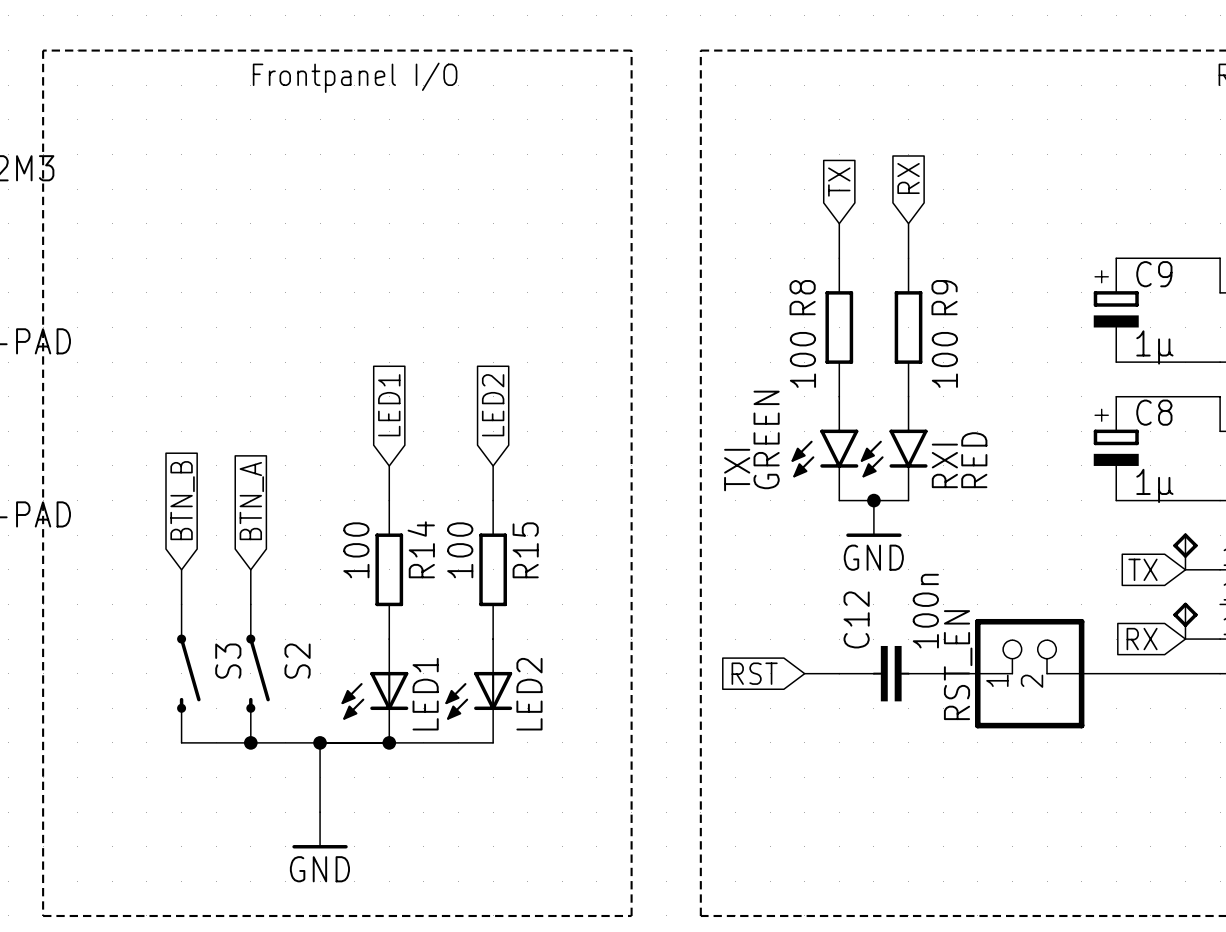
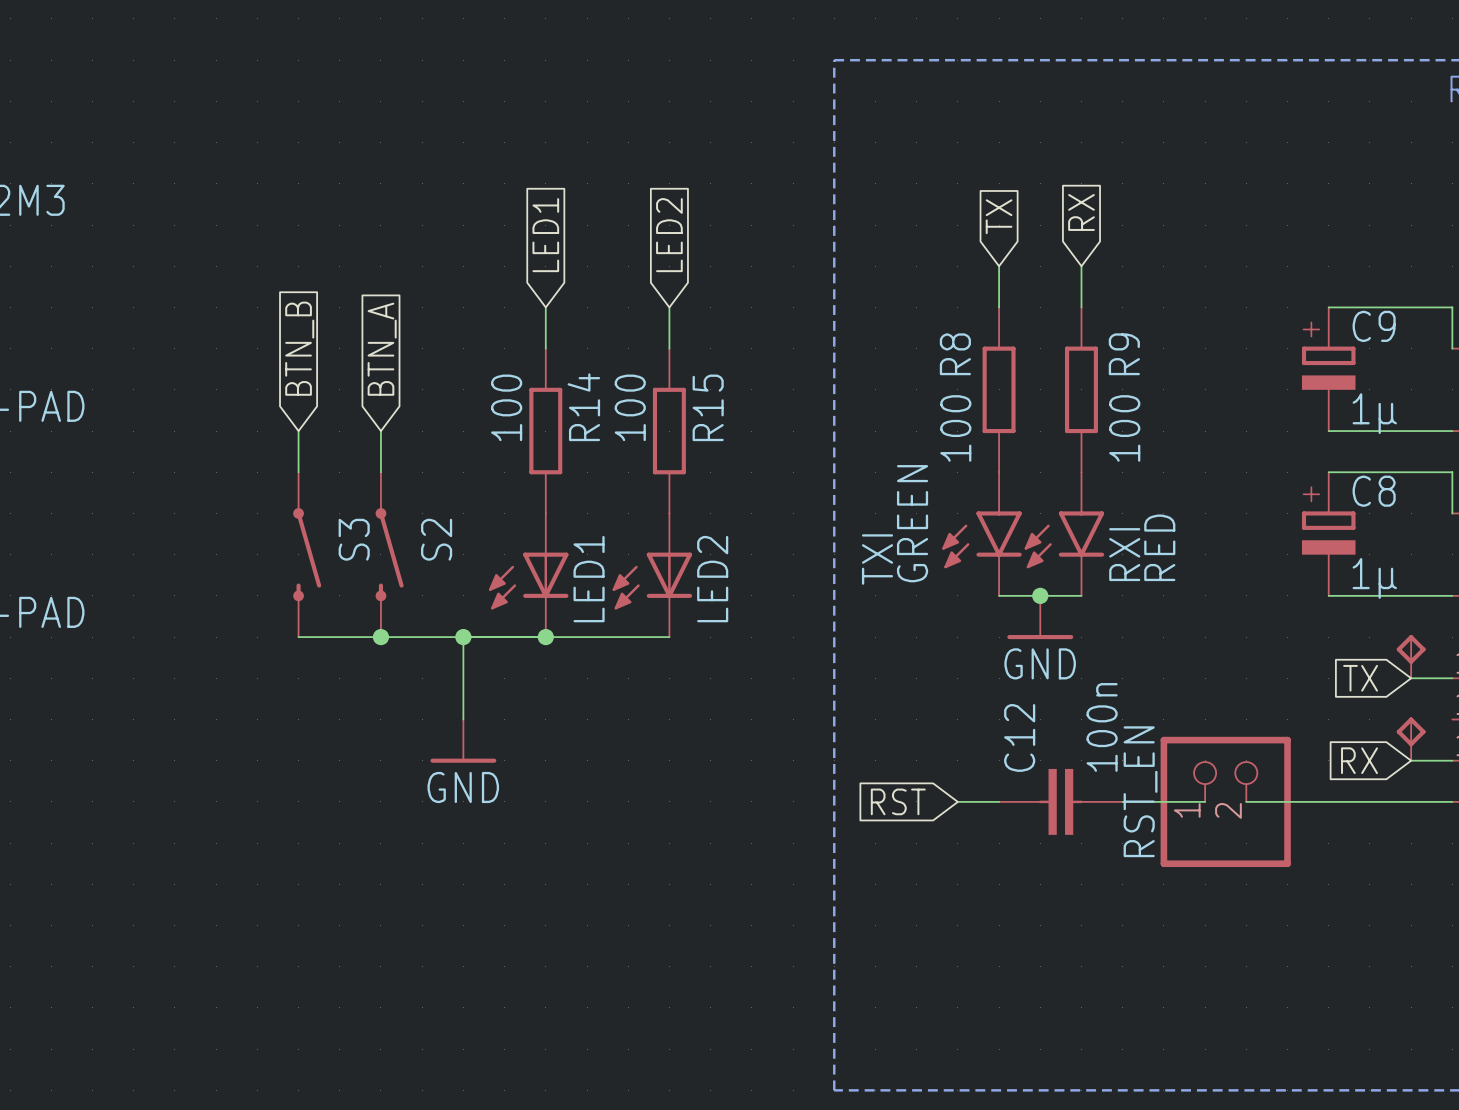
line: (43, 50) (631, 50) (631, 915) (43, 915) (43, 50) -> none
text: Frontpanel I/O (355, 77) -> none
global label position: LED1 (389, 405) -> LED1 (545, 235)
global label position: LED2 (493, 405) -> LED2 (669, 235)
wire: (389, 465) (389, 500) -> (545, 307) (545, 348)
wire: (493, 465) (493, 500) -> (669, 307) (669, 348)
global label position: BTN_B (182, 500) -> BTN_B (299, 348)
global label position: BTN_A (251, 501) -> BTN_A (382, 349)
junction: none -> (380, 637)
junction: none -> (463, 637)
junction: none -> (545, 637)
wire: (181, 569) (181, 604) -> (298, 431) (298, 472)
wire: (250, 569) (250, 604) -> (380, 431) (380, 472)
R14 position: (389, 569) -> (545, 431)
R15 position: (493, 569) -> (669, 431)
S3 position: (188, 673) -> (307, 554)
S2 position: (258, 673) -> (389, 554)
LED1 position: (374, 690) -> (528, 575)
LED2 position: (478, 690) -> (652, 575)
wire: (181, 742) (493, 742) -> (298, 637) (669, 637)
junction: (250, 742) -> none
wire: (320, 742) (320, 812) -> (463, 637) (463, 719)
junction: (320, 742) -> none
junction: (389, 742) -> none
power symbol position: GND (320, 830) -> GND (463, 741)

